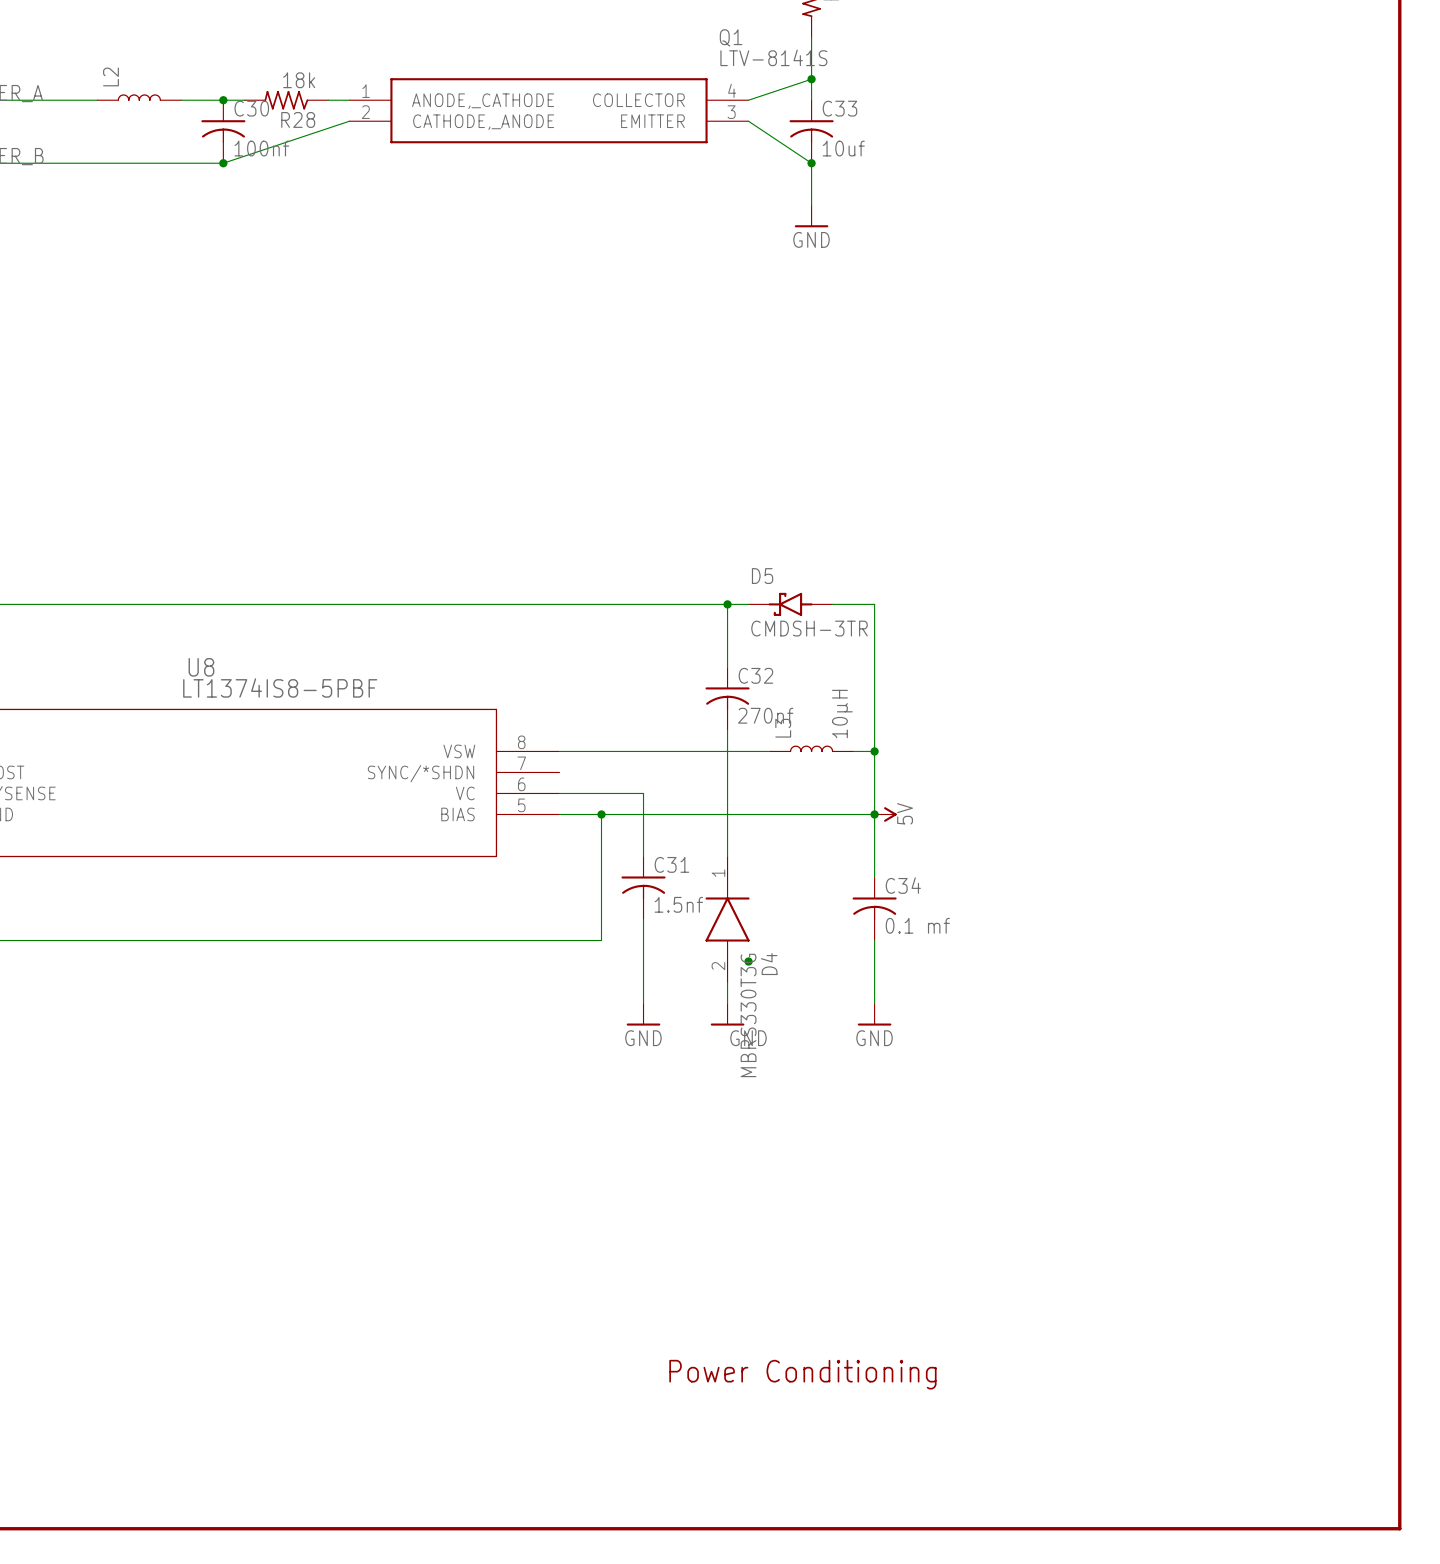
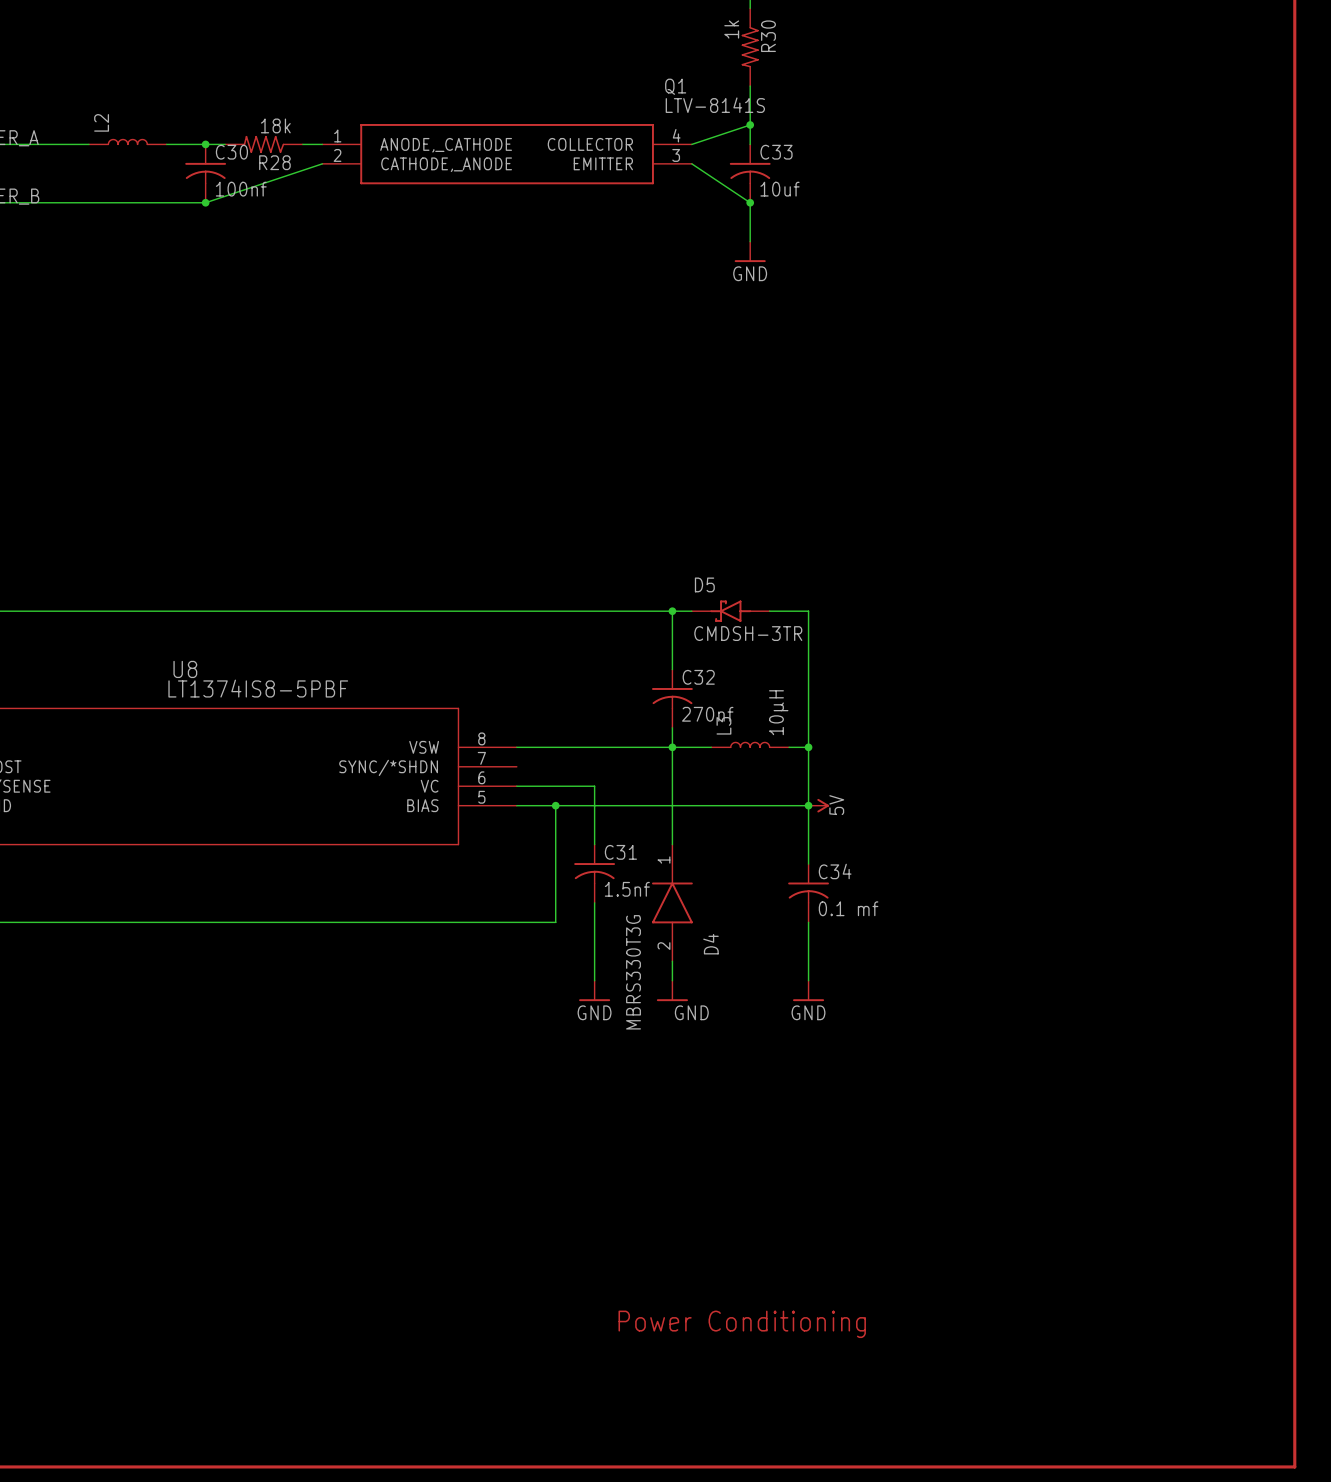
junction: none -> (672, 747)
junction: (748, 961) -> none
D4 value position: MBRS330T3G (748, 1015) -> MBRS330T3G (633, 972)

